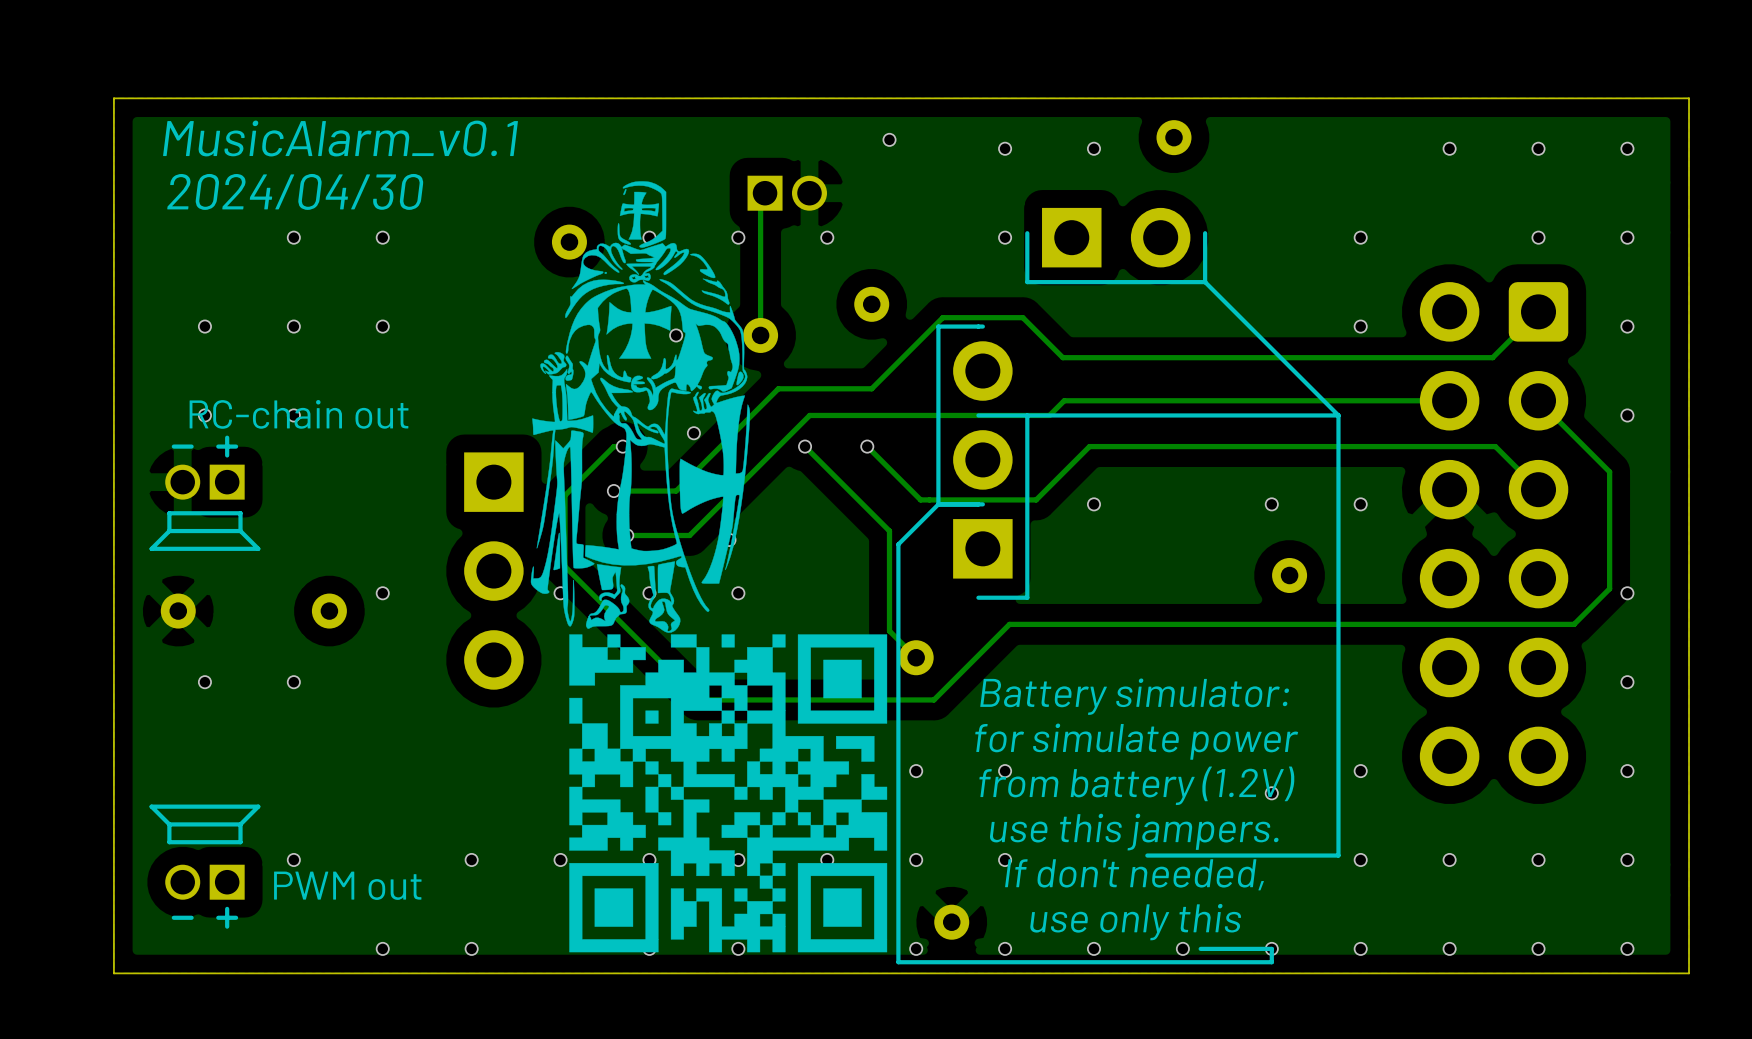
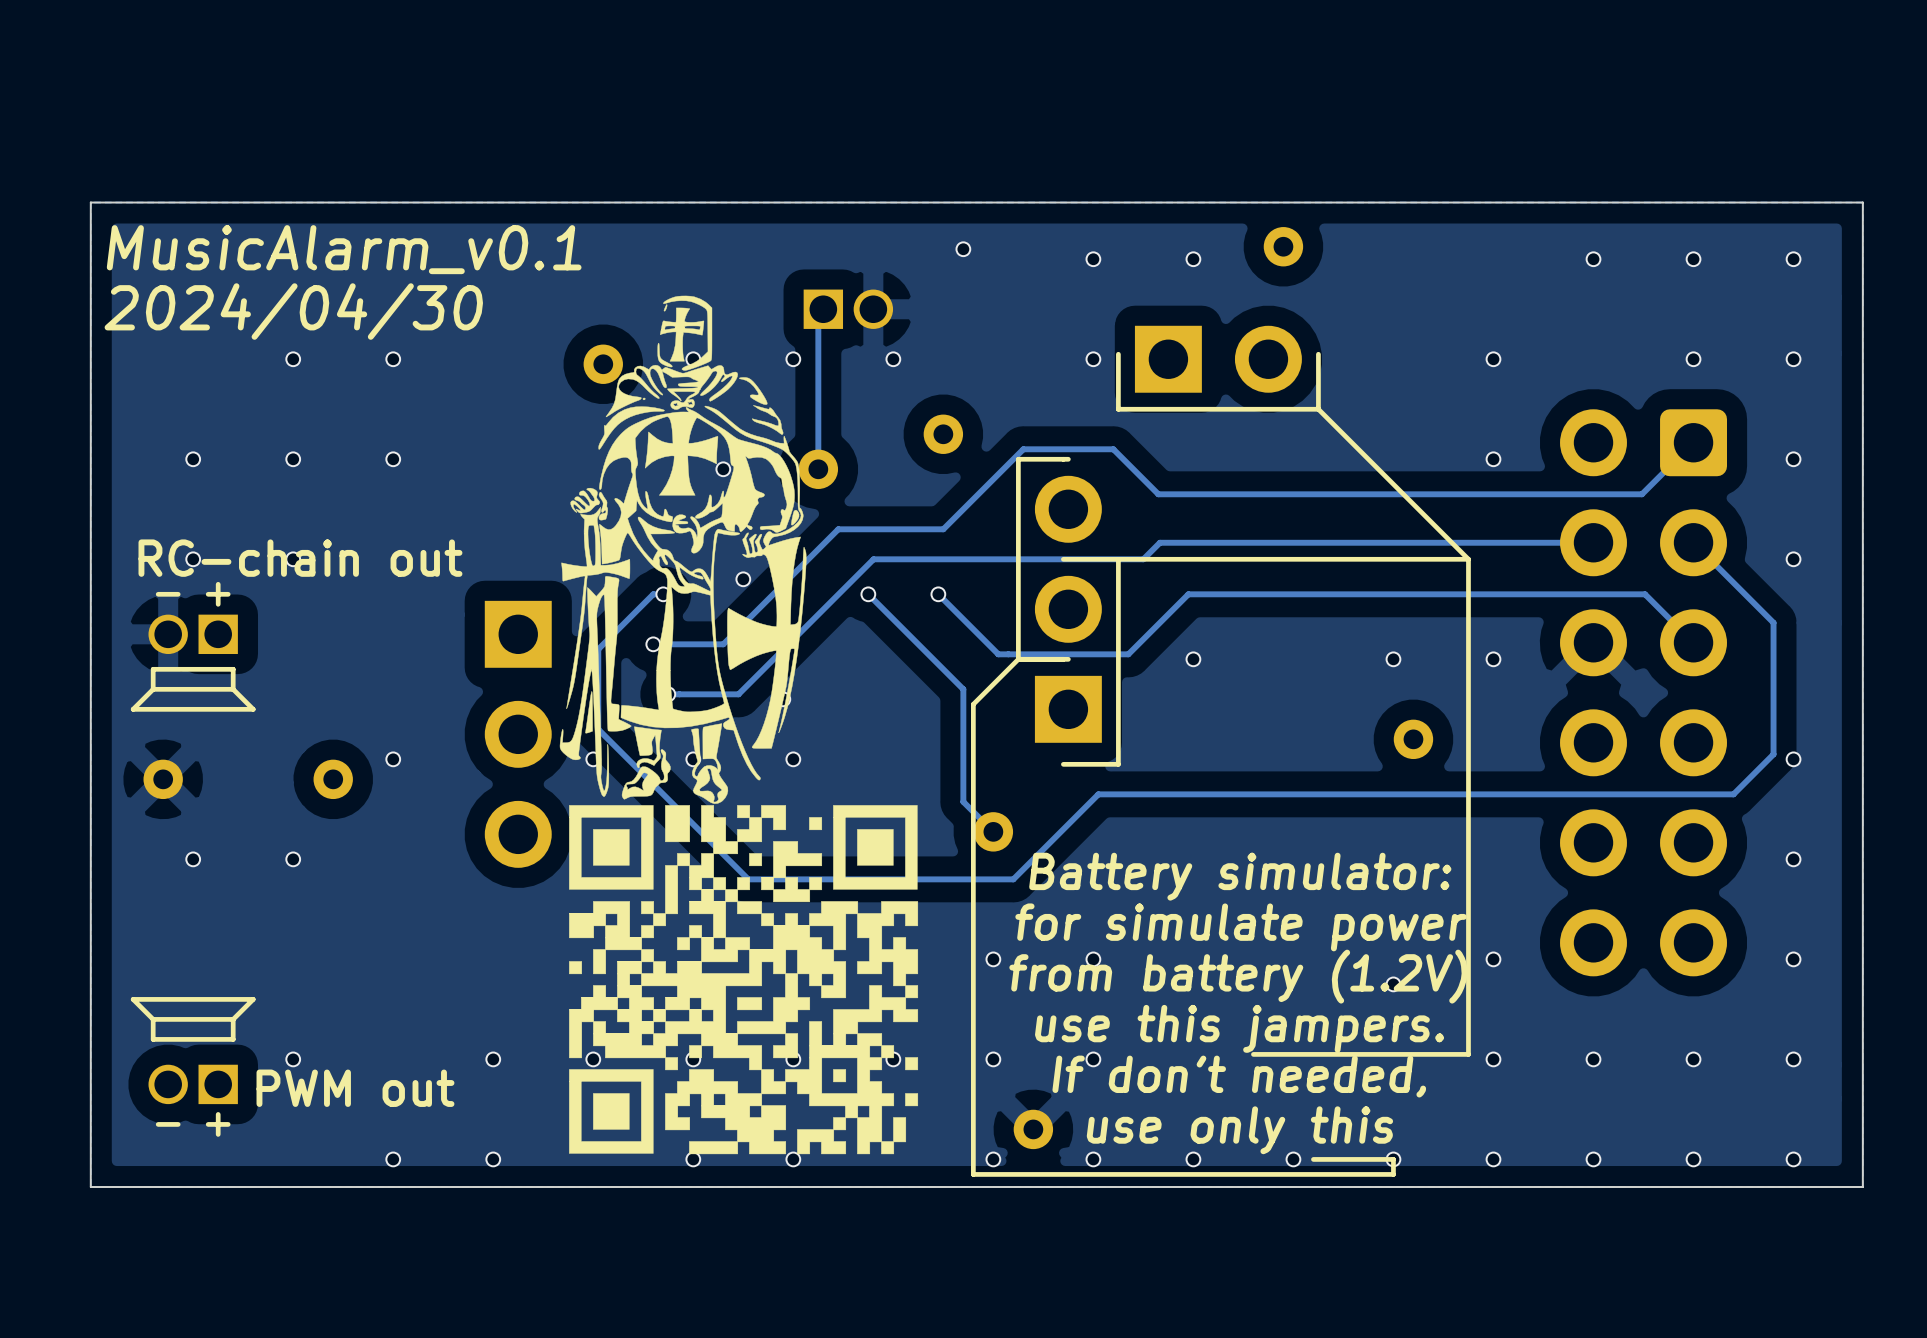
drawing shape: [569, 634, 888, 953] -> [569, 805, 919, 1155]

